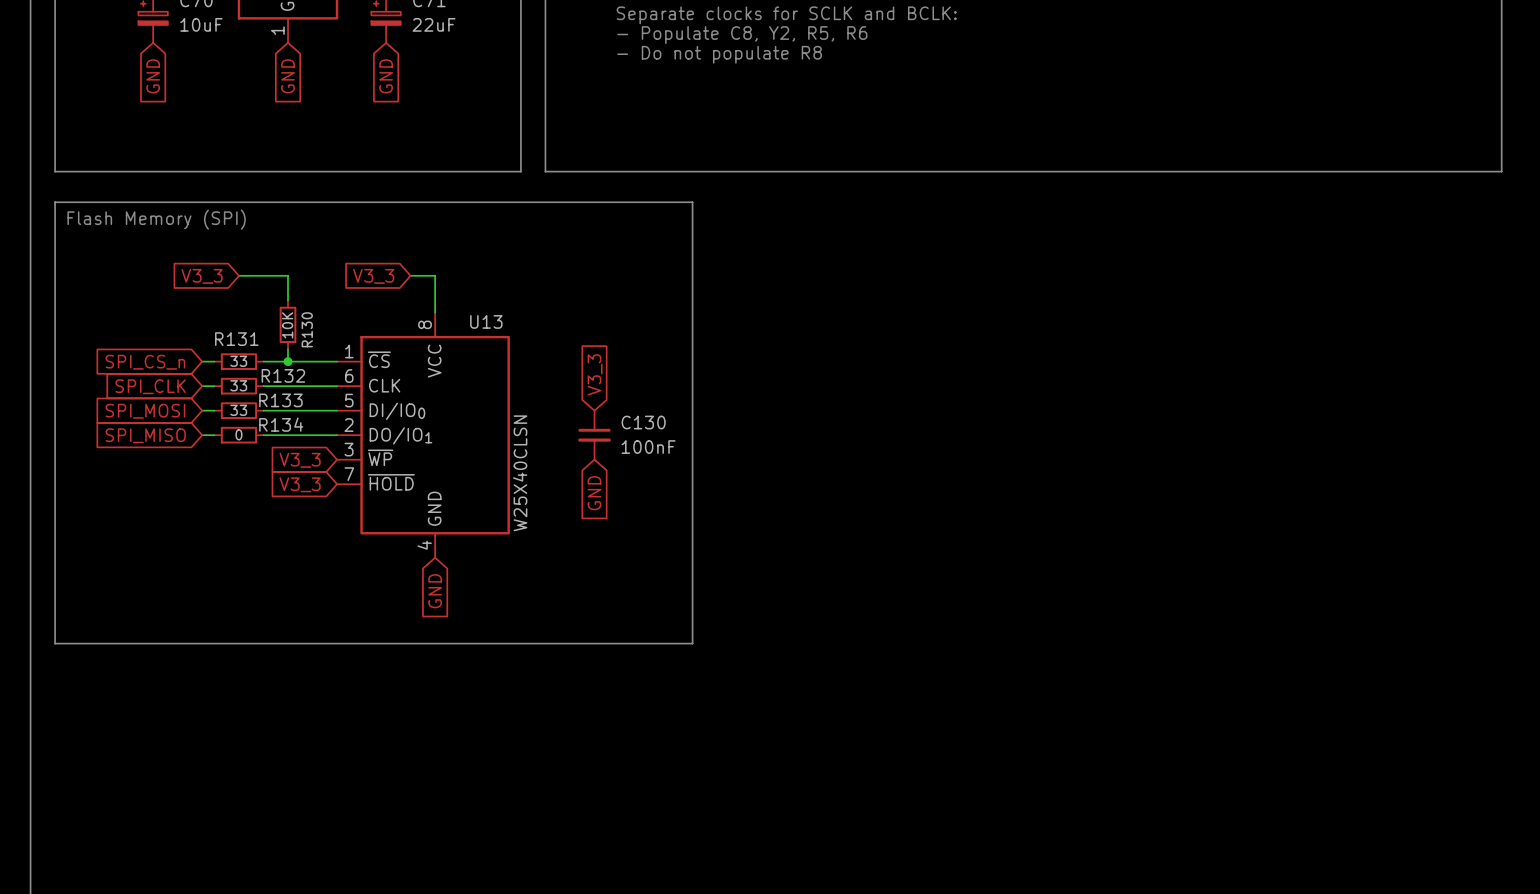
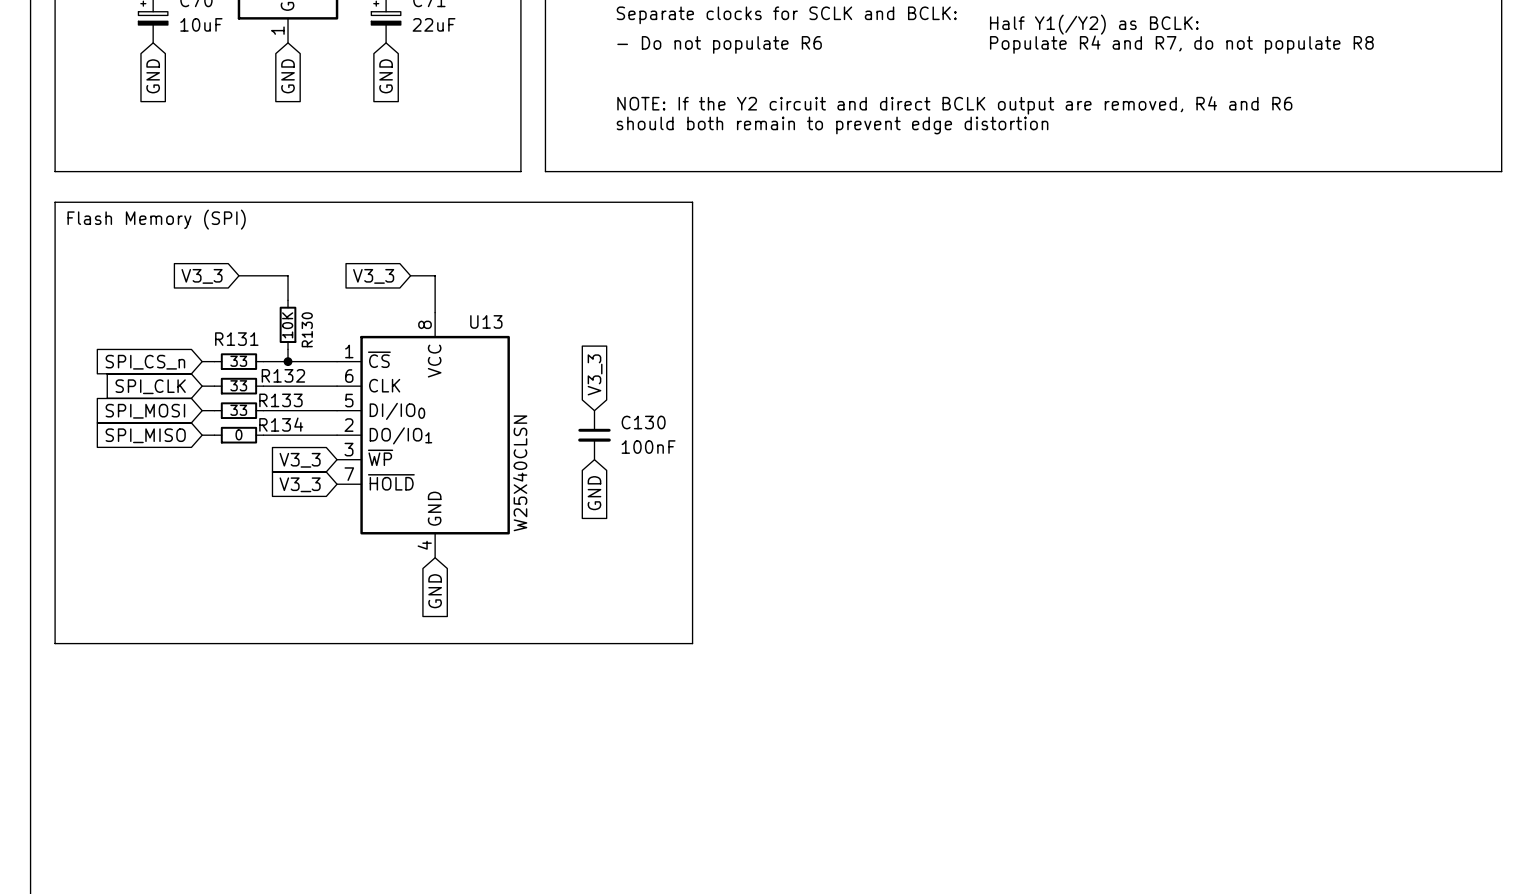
text: none -> Half Y1(/Y2) as BCLK: (1094, 24)
text: - Populate C8, Y2, R5, R6 (742, 35) -> none
text: none -> Populate R4 and R7, do not populate R8 (1181, 44)
text: - Do not populate R8 (719, 54) -> - Do not populate R6 (719, 44)
text: none -> NOTE: If the Y2 circuit and direct BCLK output are removed, R4 and R6 (954, 105)
text: none -> should both remain to prevent edge distortion (832, 125)

